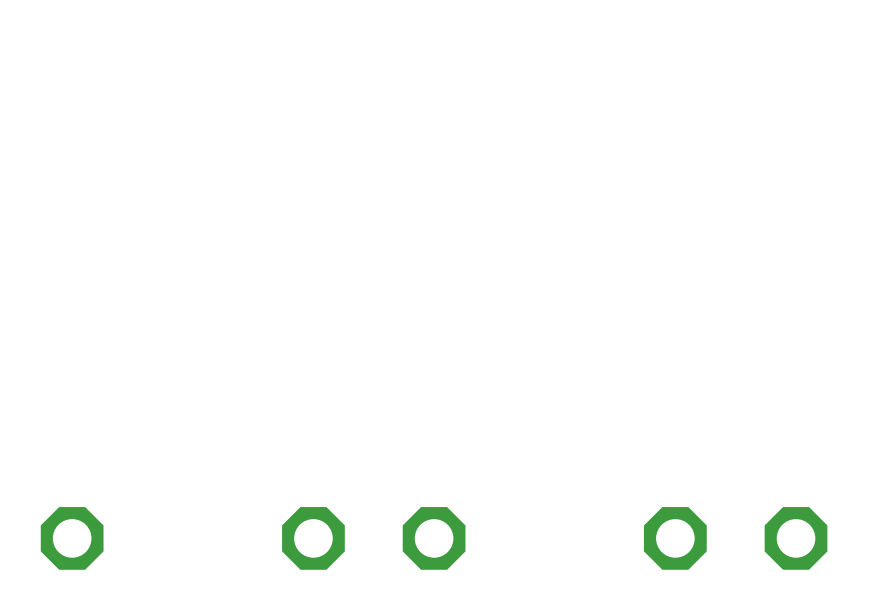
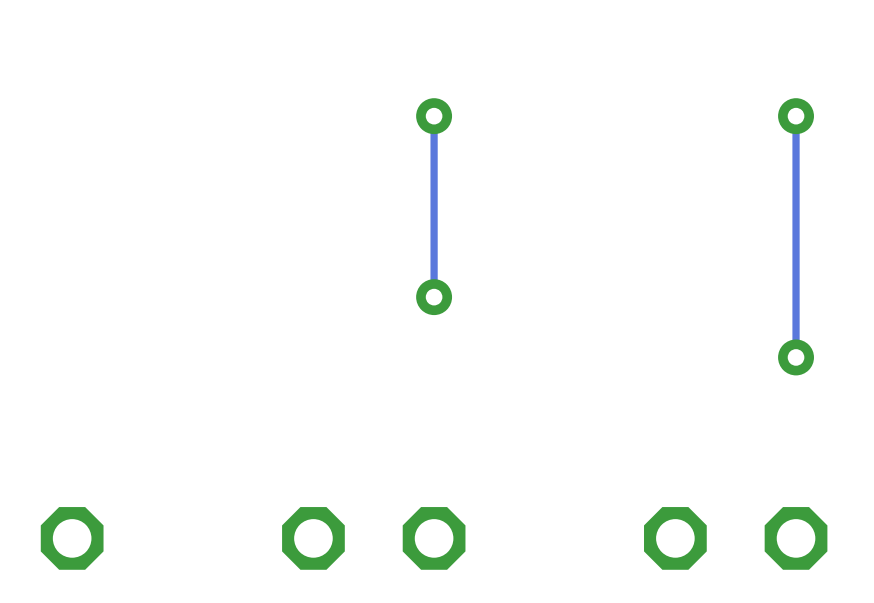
track: none -> (434, 116) (434, 297)
via: none -> (434, 116)
track: none -> (796, 116) (796, 357)
via: none -> (796, 116)
via: none -> (434, 297)
via: none -> (796, 357)

